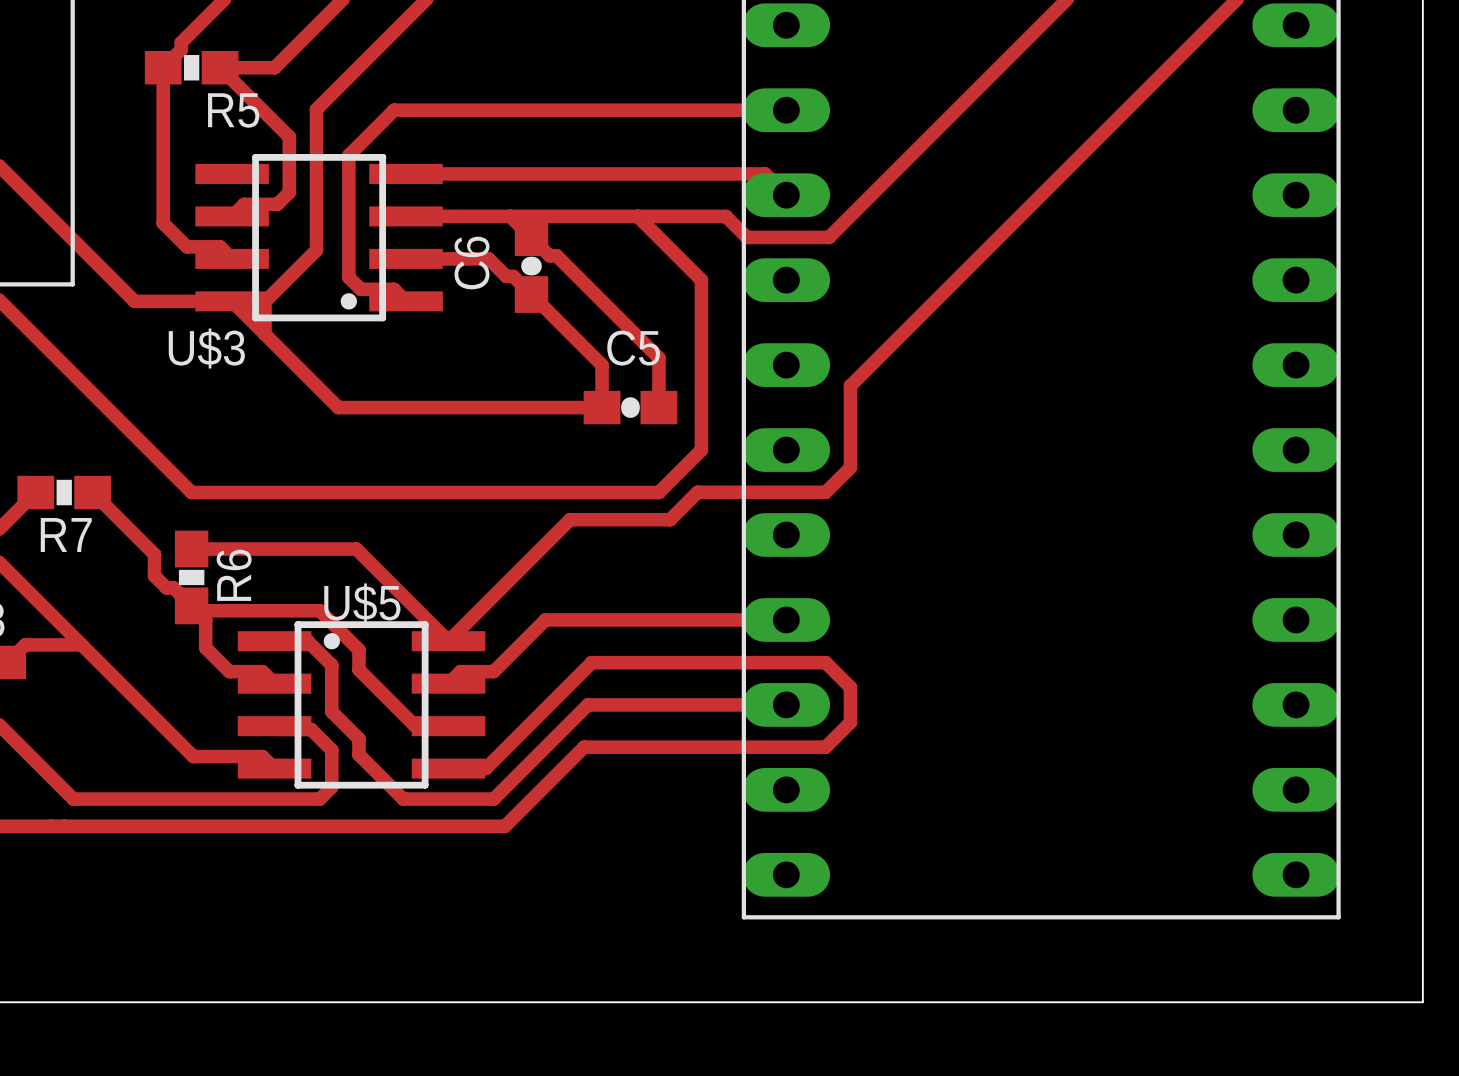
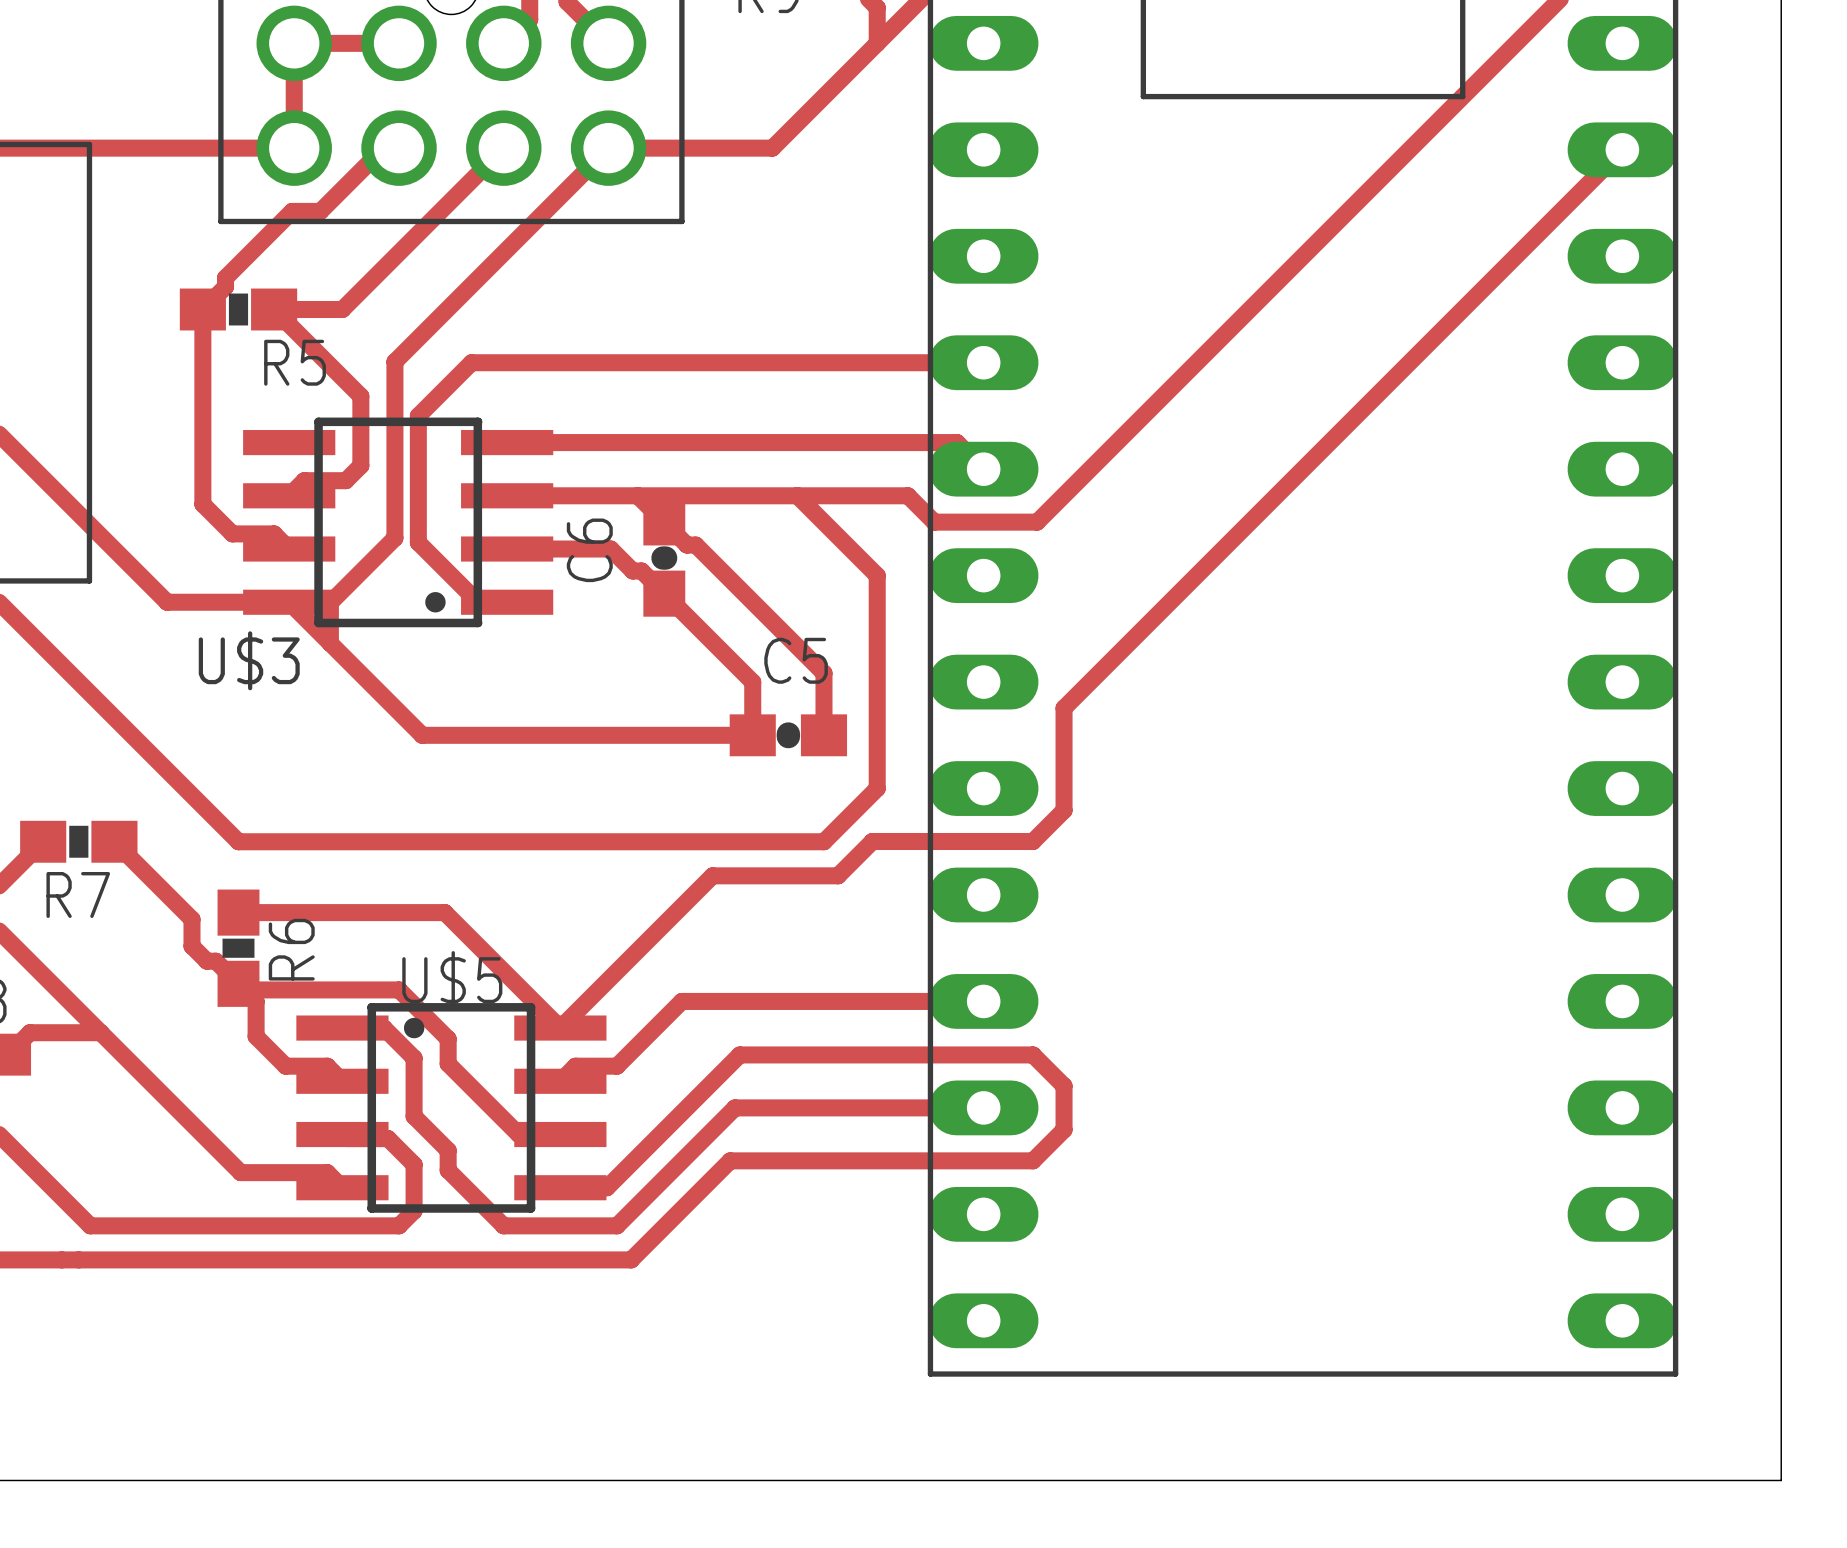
track: (394, 110) (348, 155) (348, 277) (360, 289) (394, 289) (406, 301) -> (492, 362) (471, 362) (418, 415) (418, 542) (478, 602) (507, 602)

